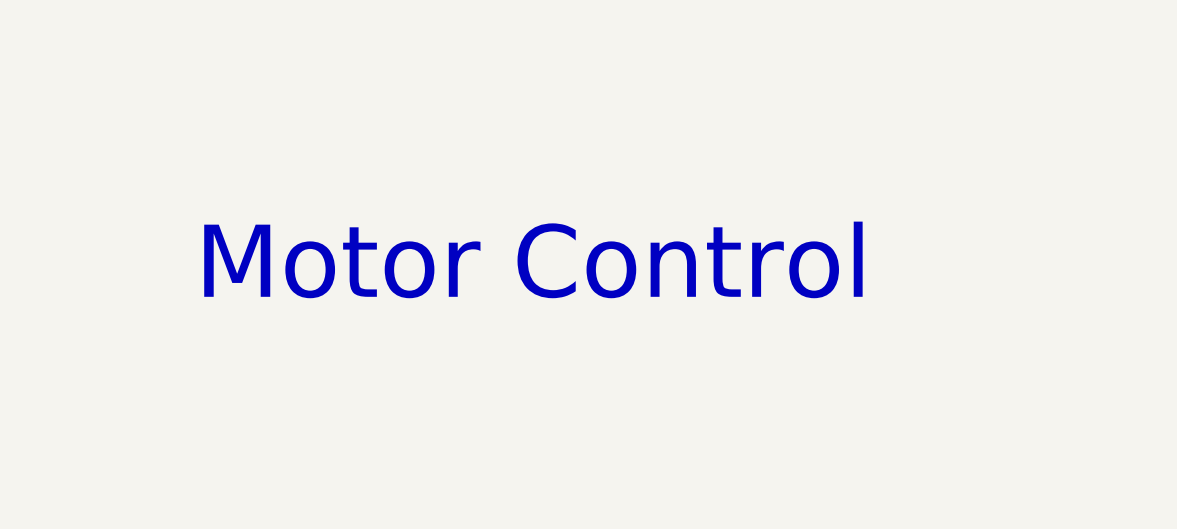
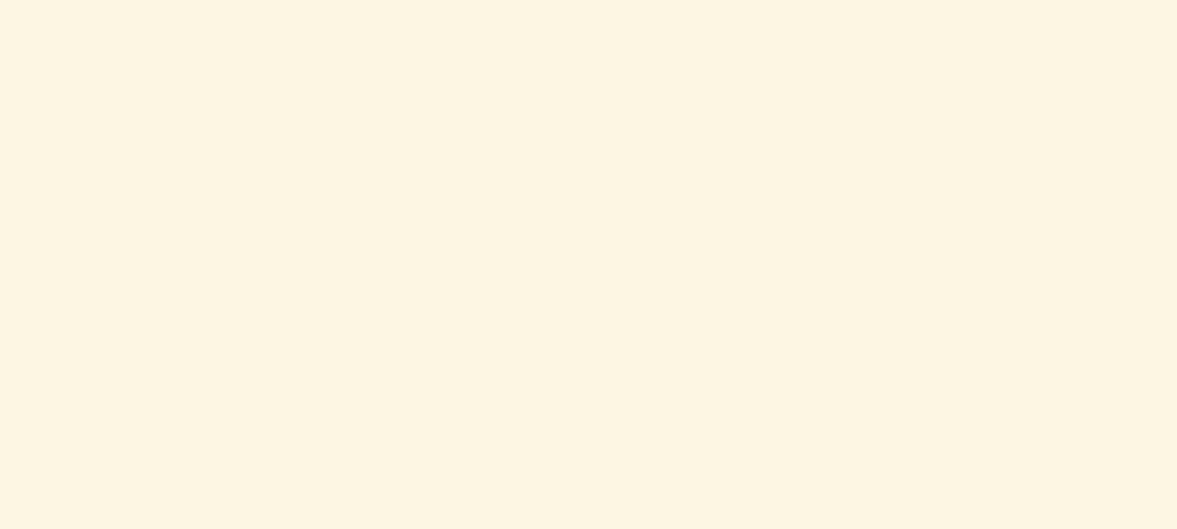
text: Motor Control (533, 259) -> none

